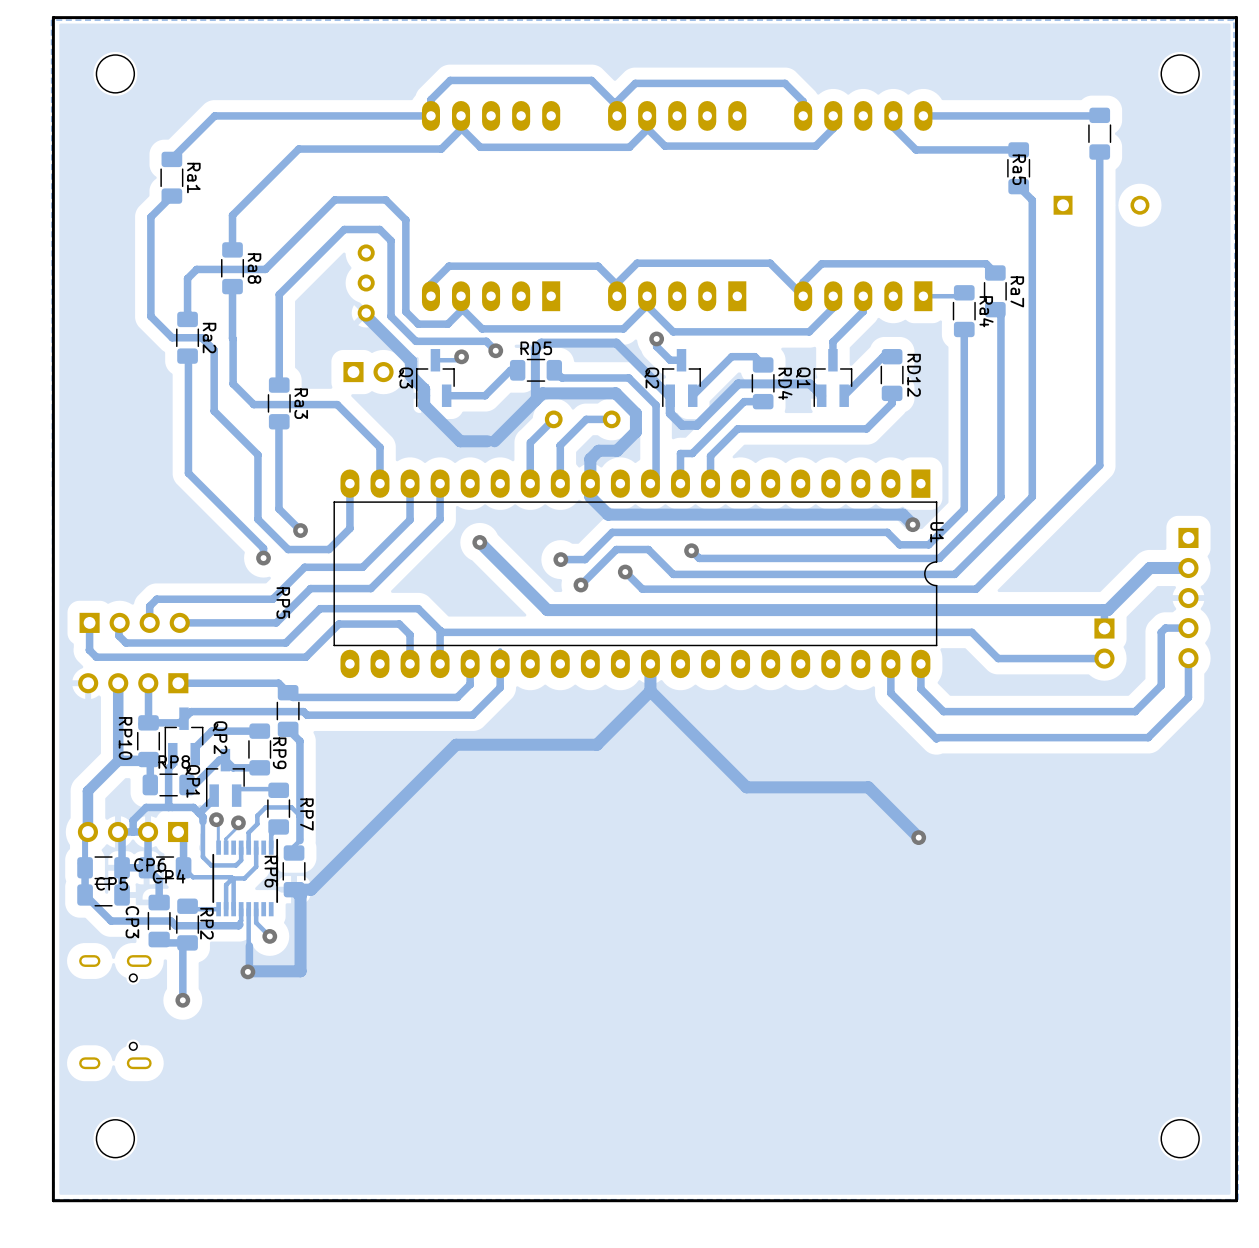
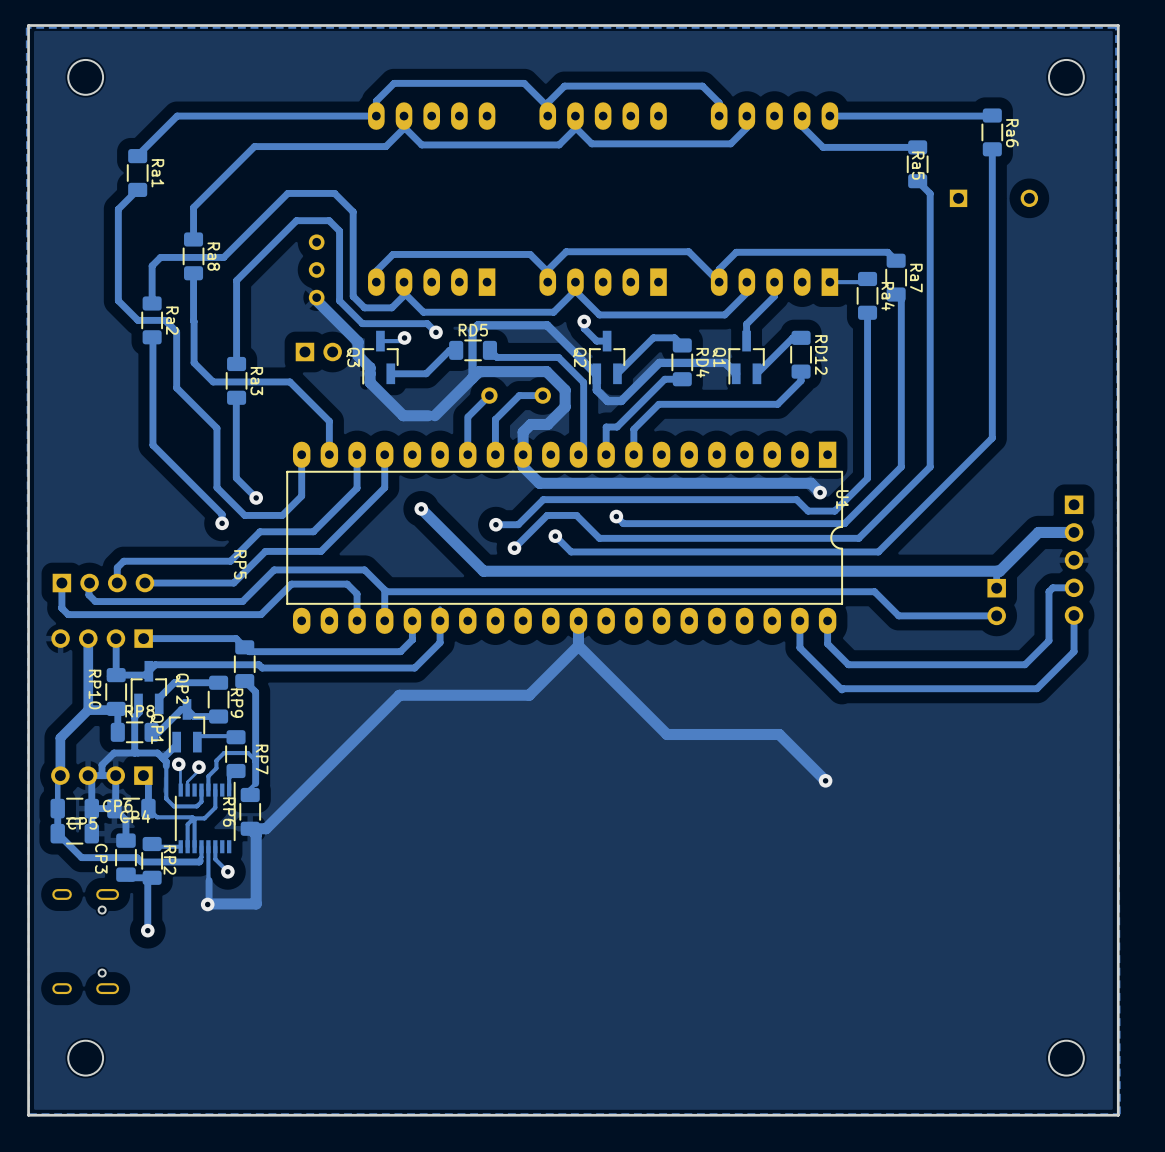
Ra6 name: none -> Ra6 (1012, 133)

